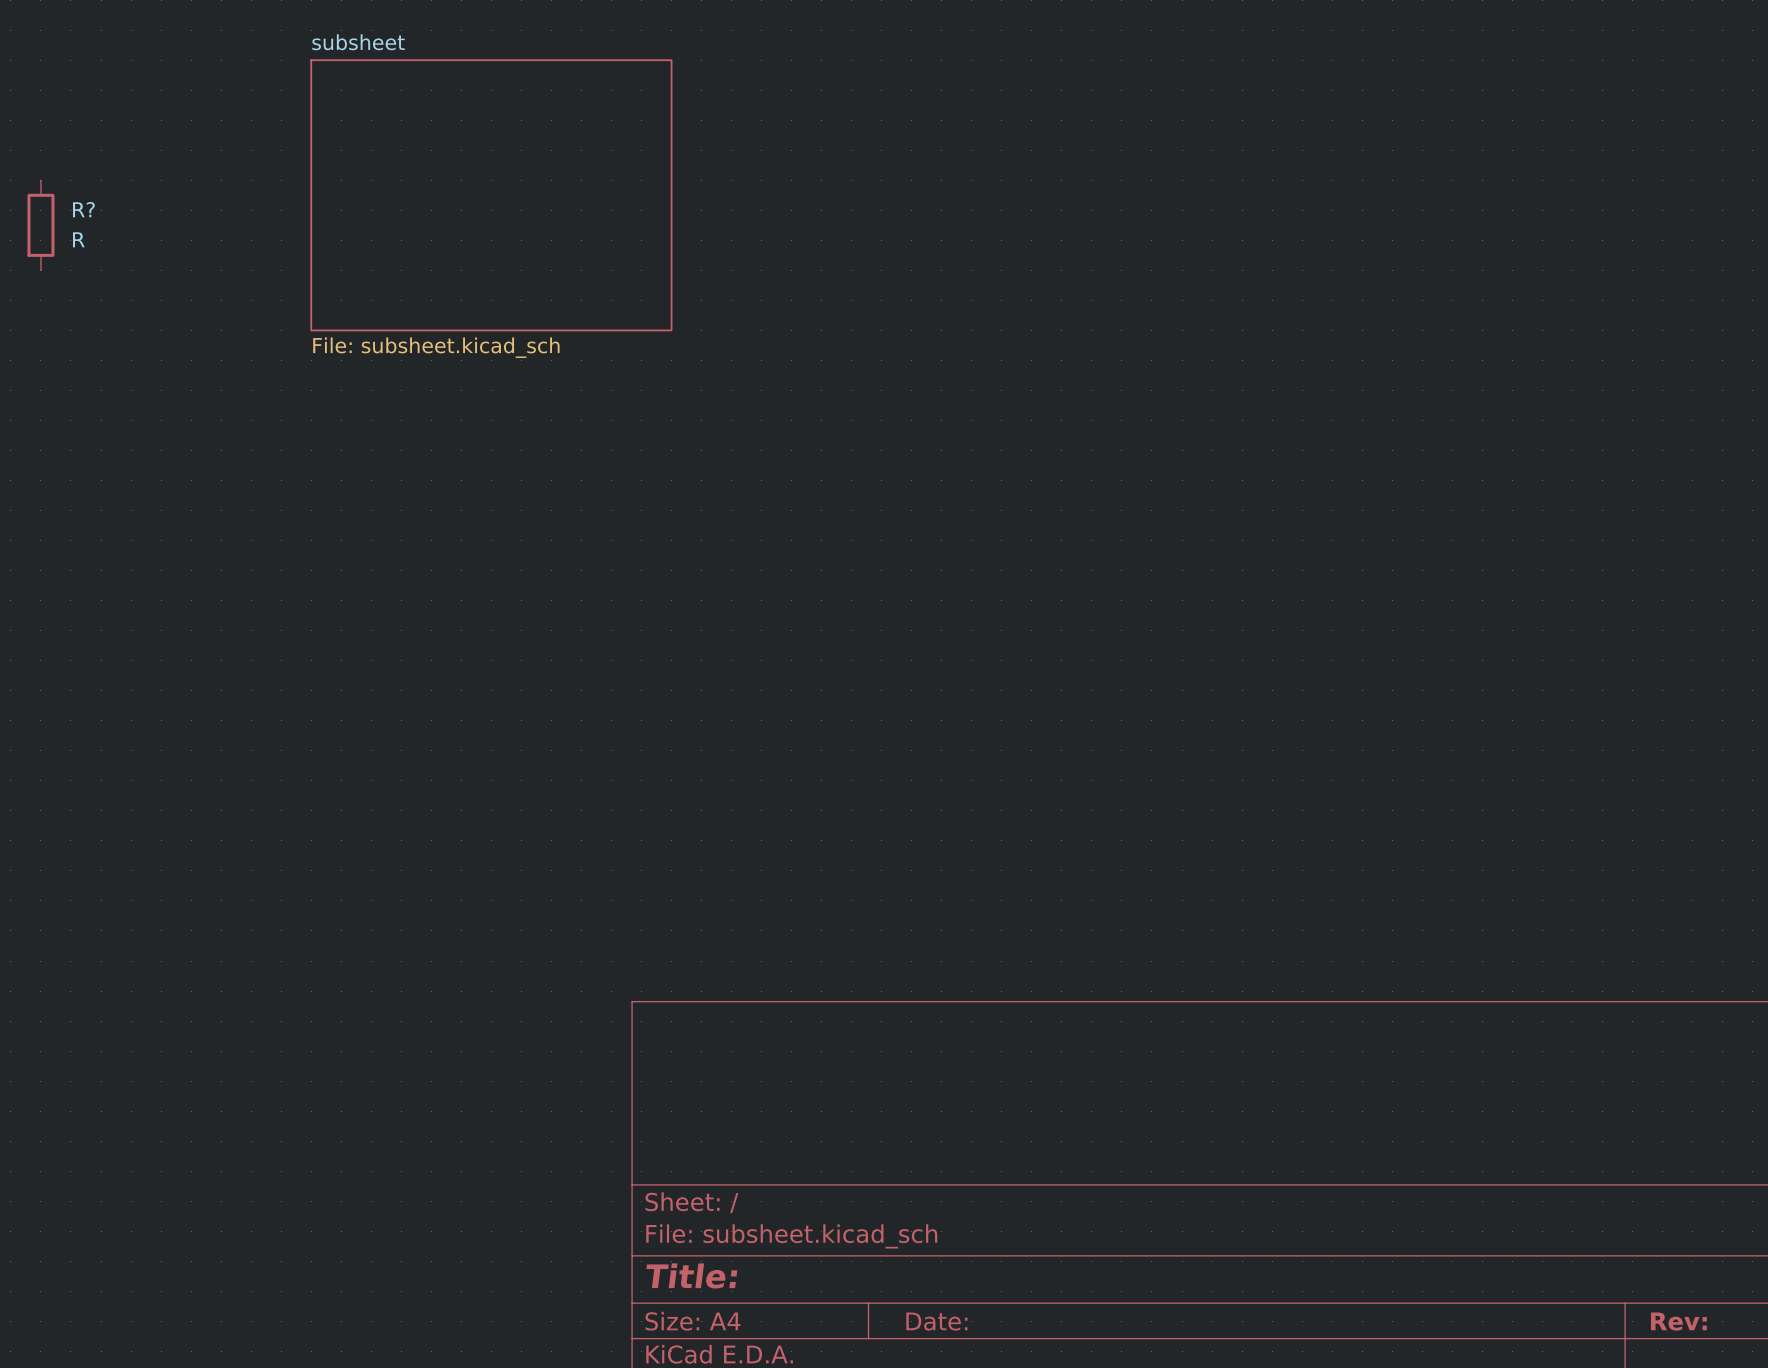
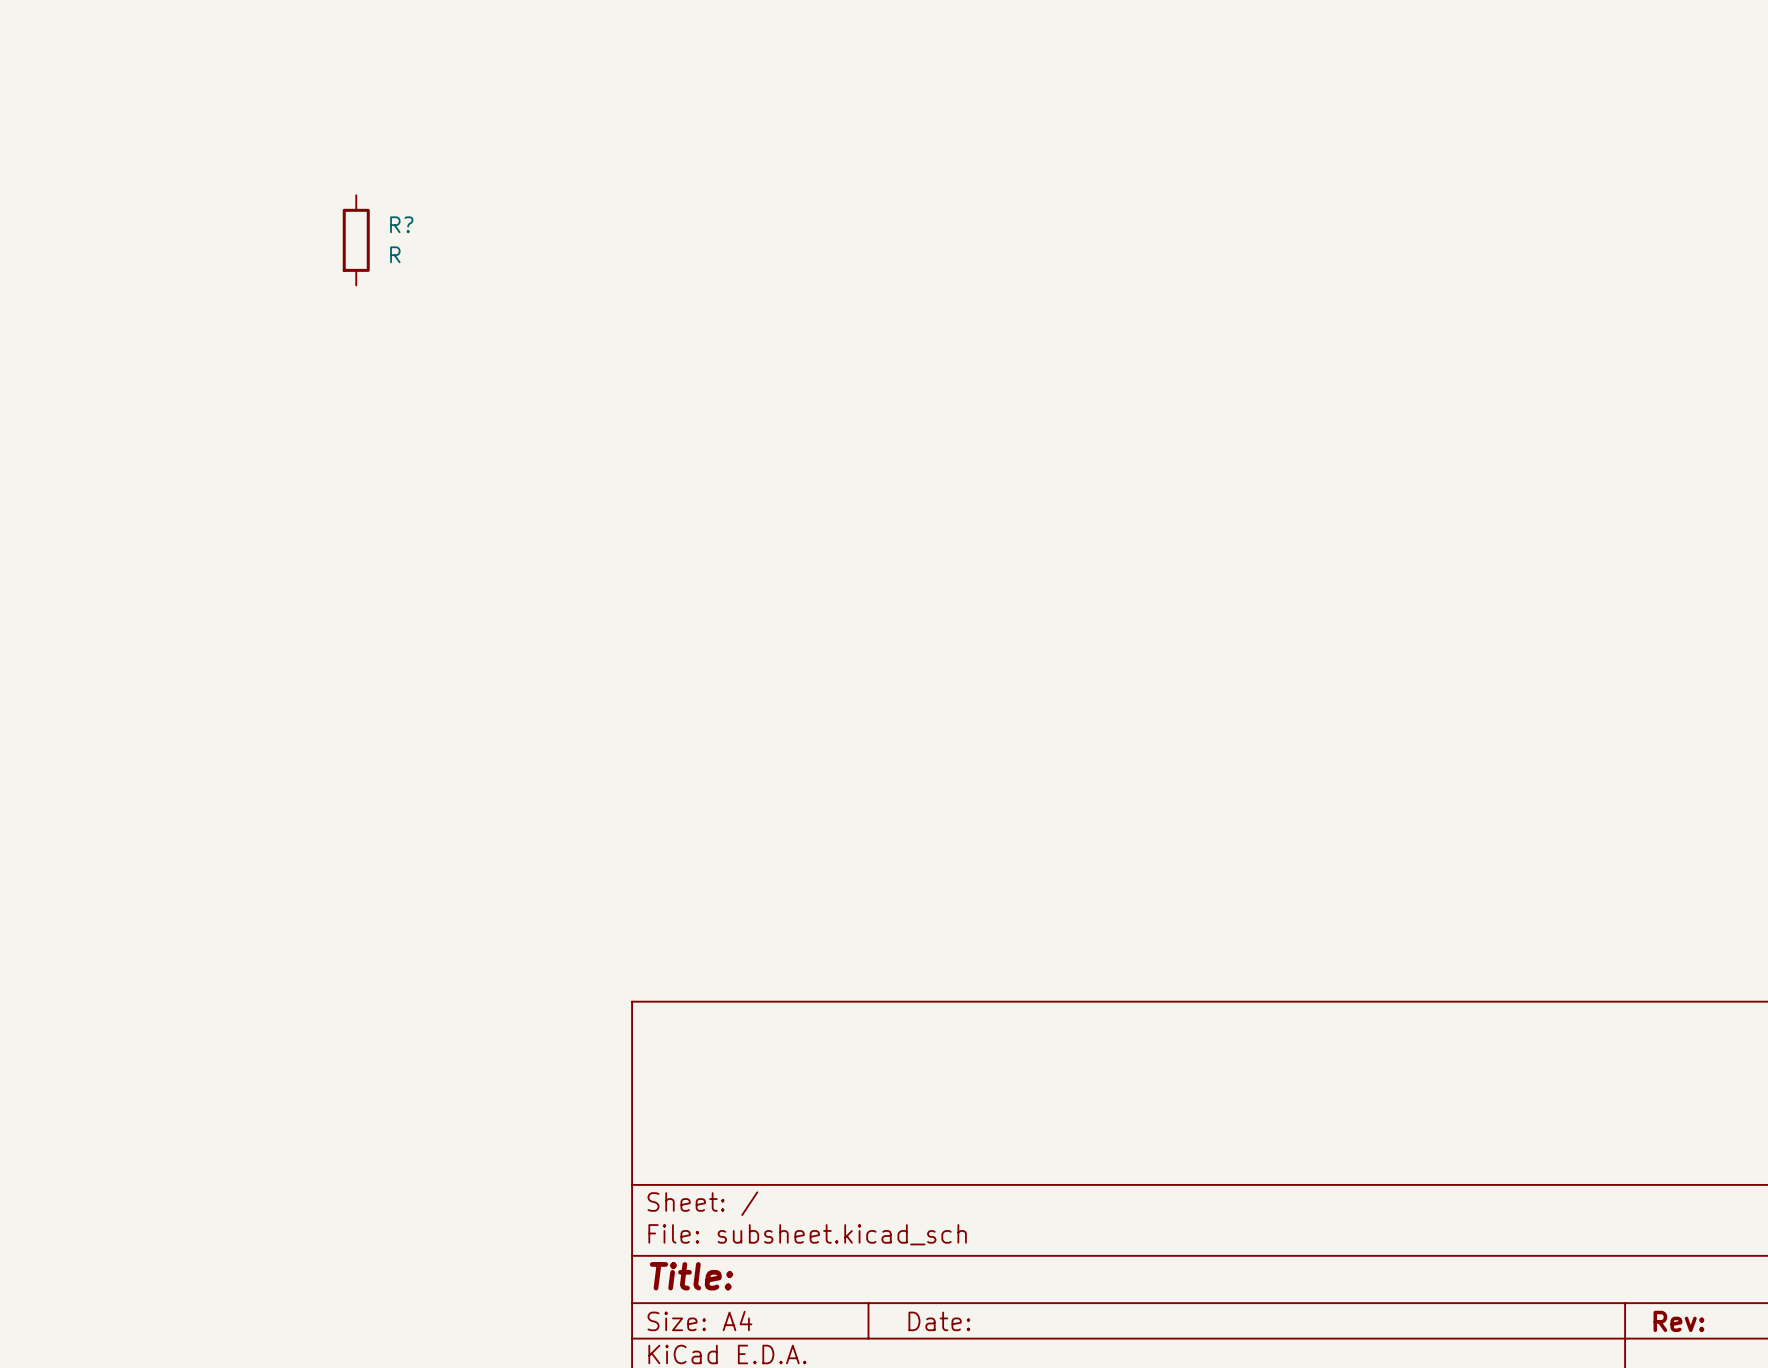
sheet subsheet: File: subsheet.kicad_sch (491, 195) -> none
R?: R (40, 225) -> none
R?: none -> R (356, 240)

